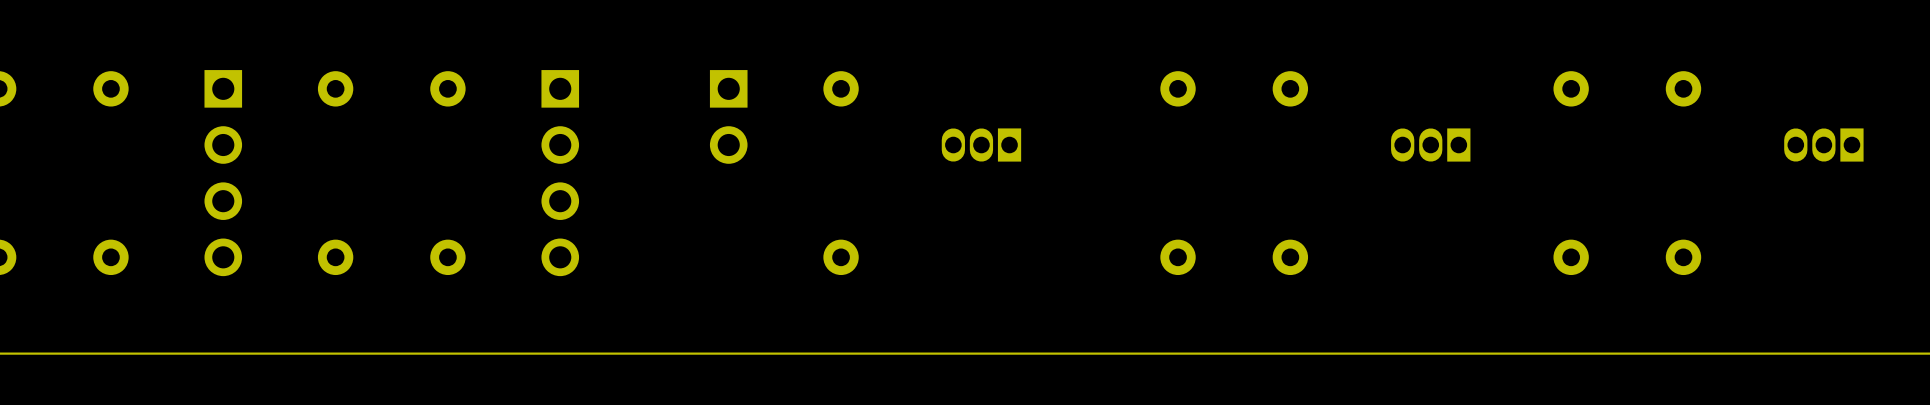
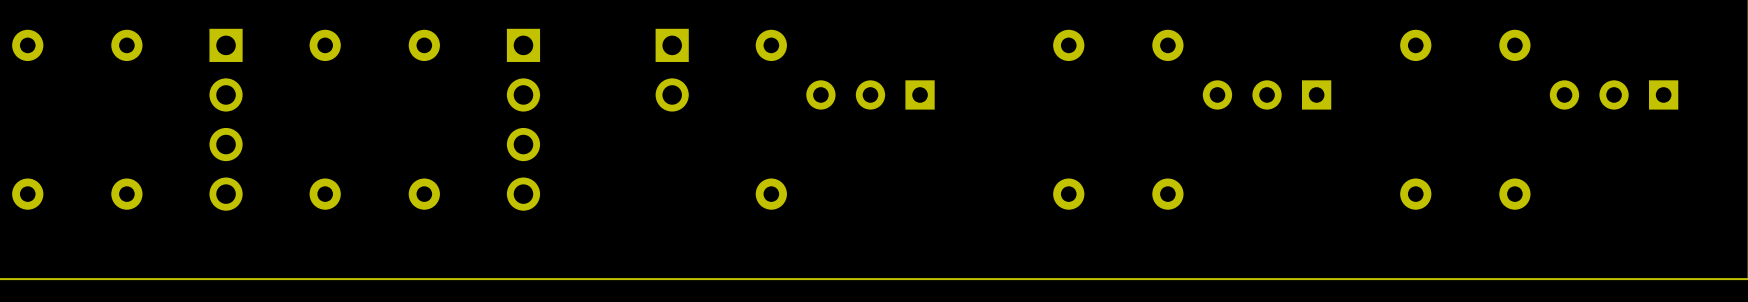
part: none -> (870, 94)
part: (981, 145) -> none
part: none -> (1267, 94)
part: (1430, 145) -> none
part: none -> (1614, 94)
part: (1823, 145) -> none

